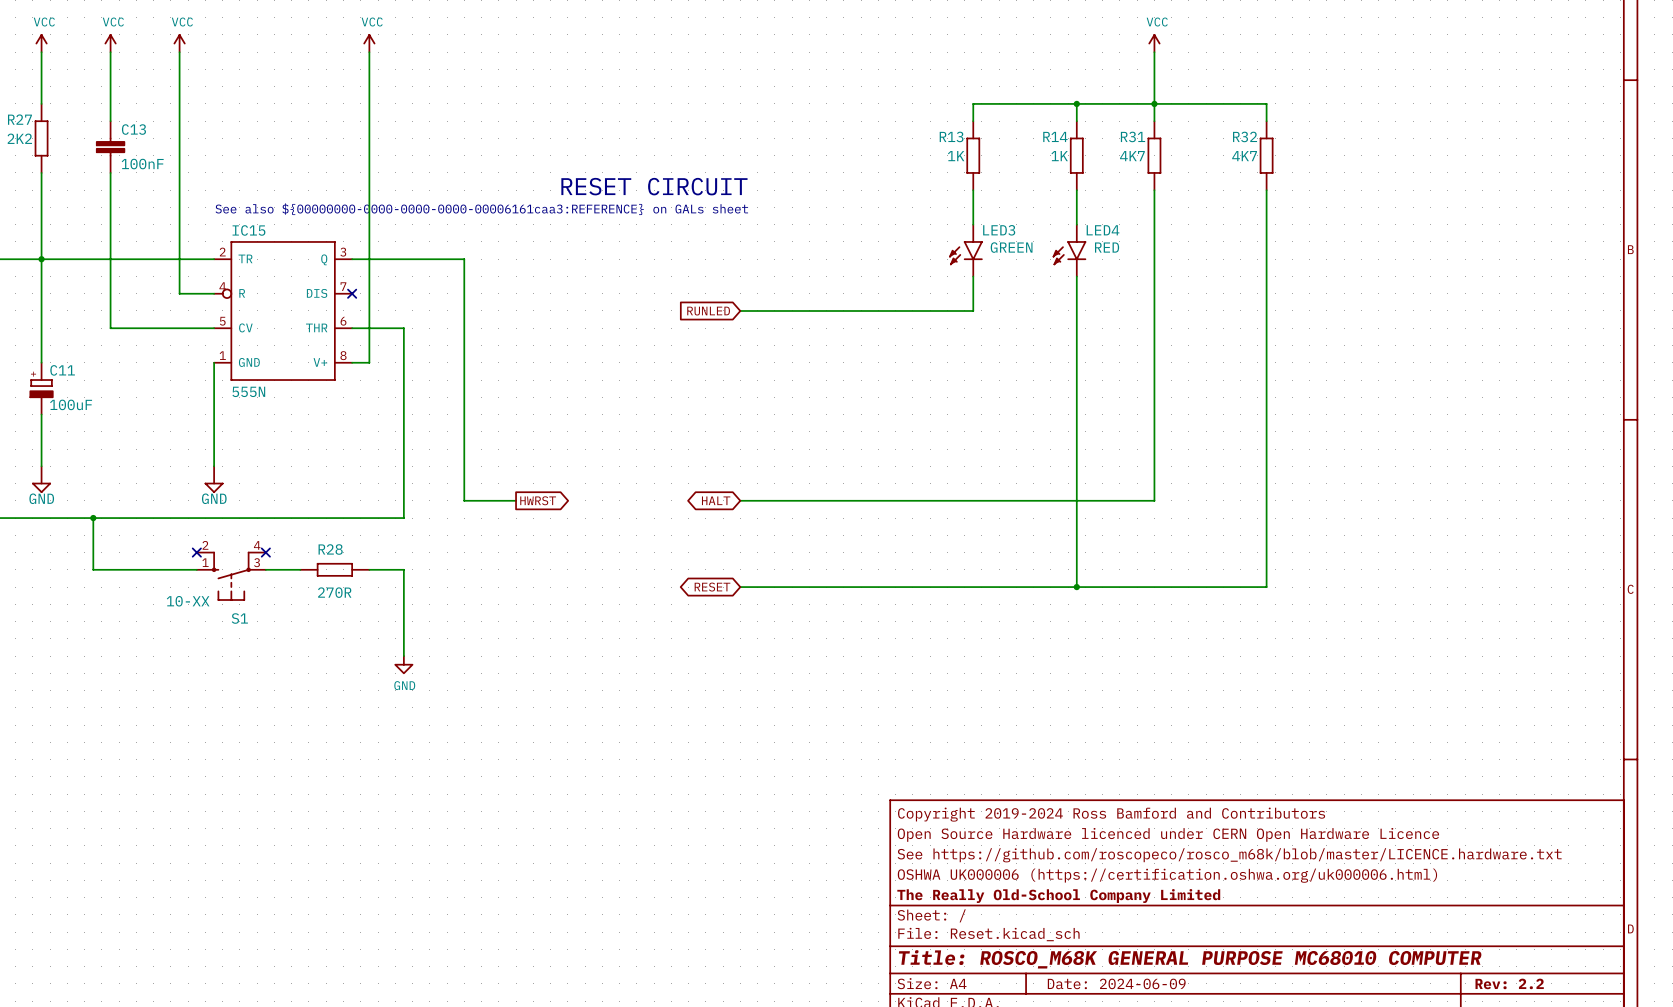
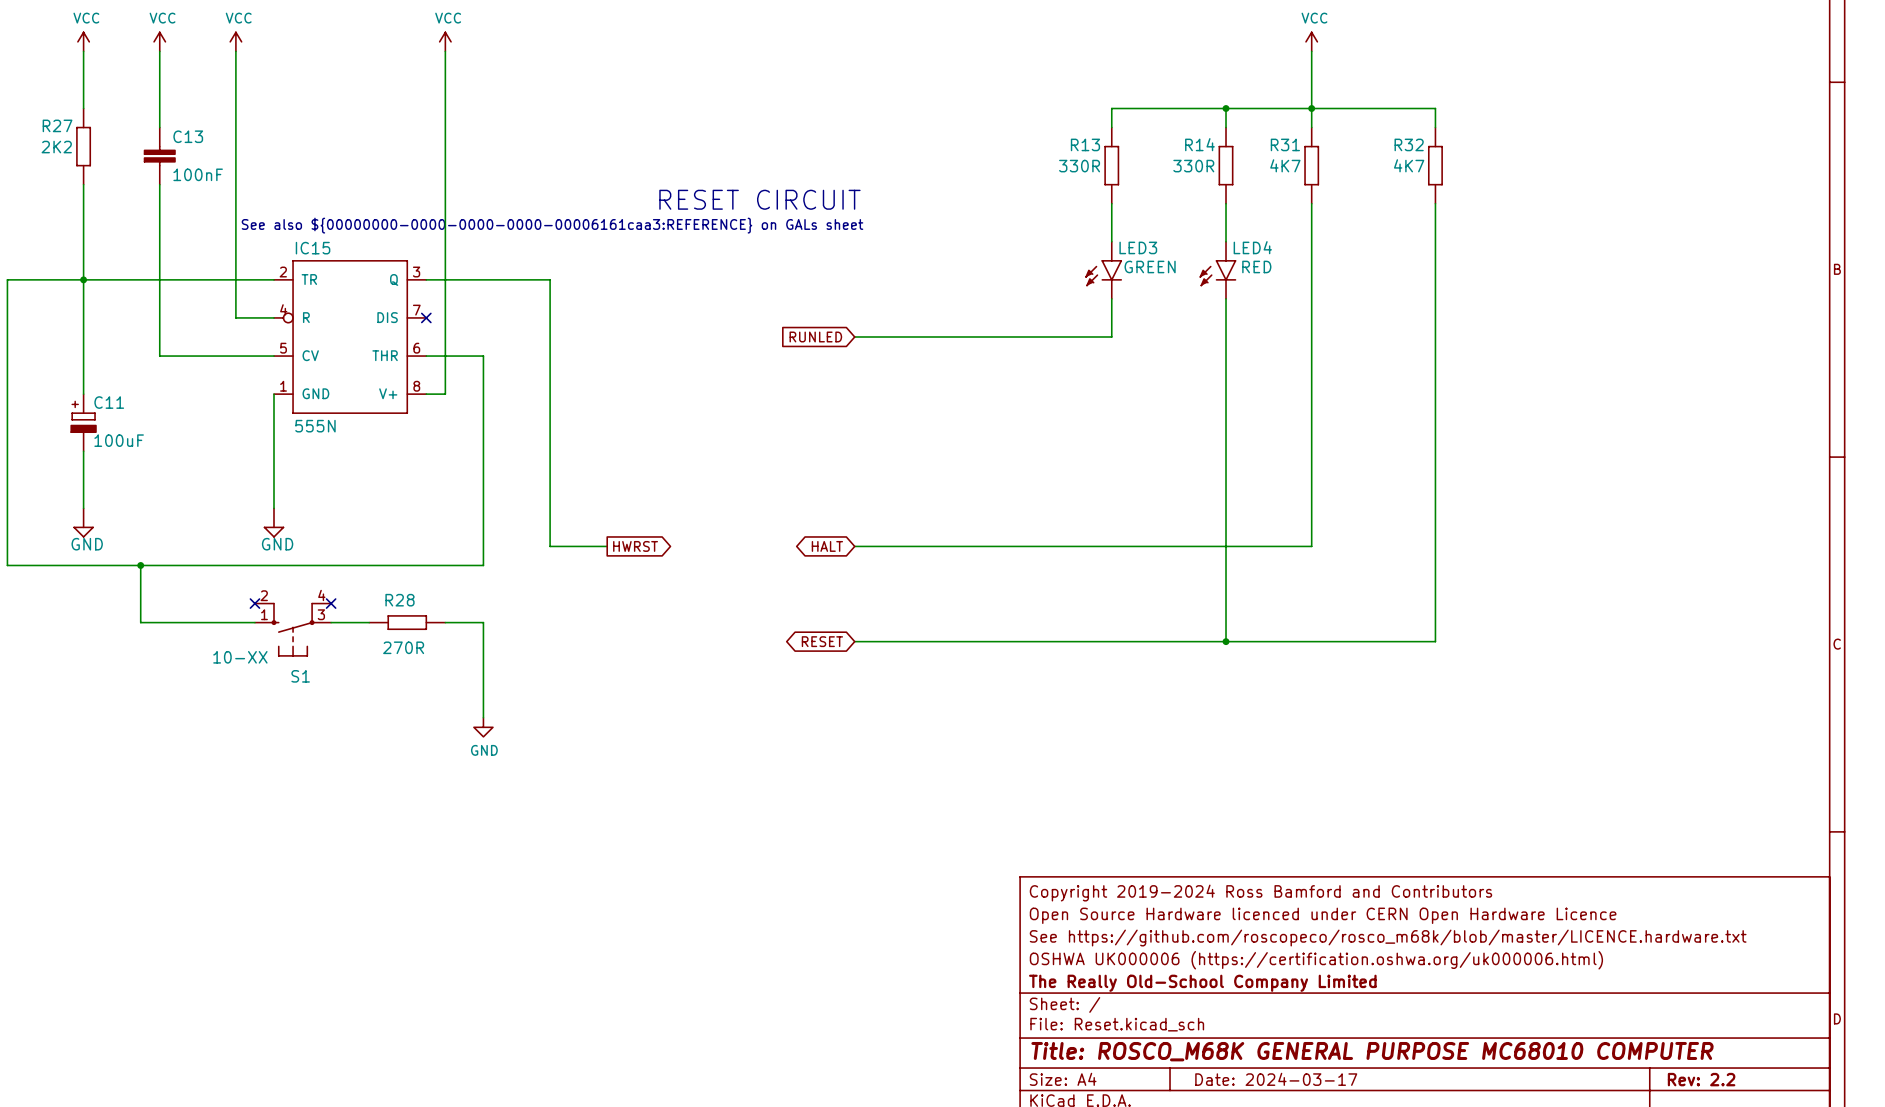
R13 value: 1K (956, 156) -> 330R (1079, 166)
R14 value: 1K (1059, 156) -> 330R (1193, 166)
title block: Date: 2024-06-09 (1116, 983) -> Date: 2024-03-17 (1276, 1079)

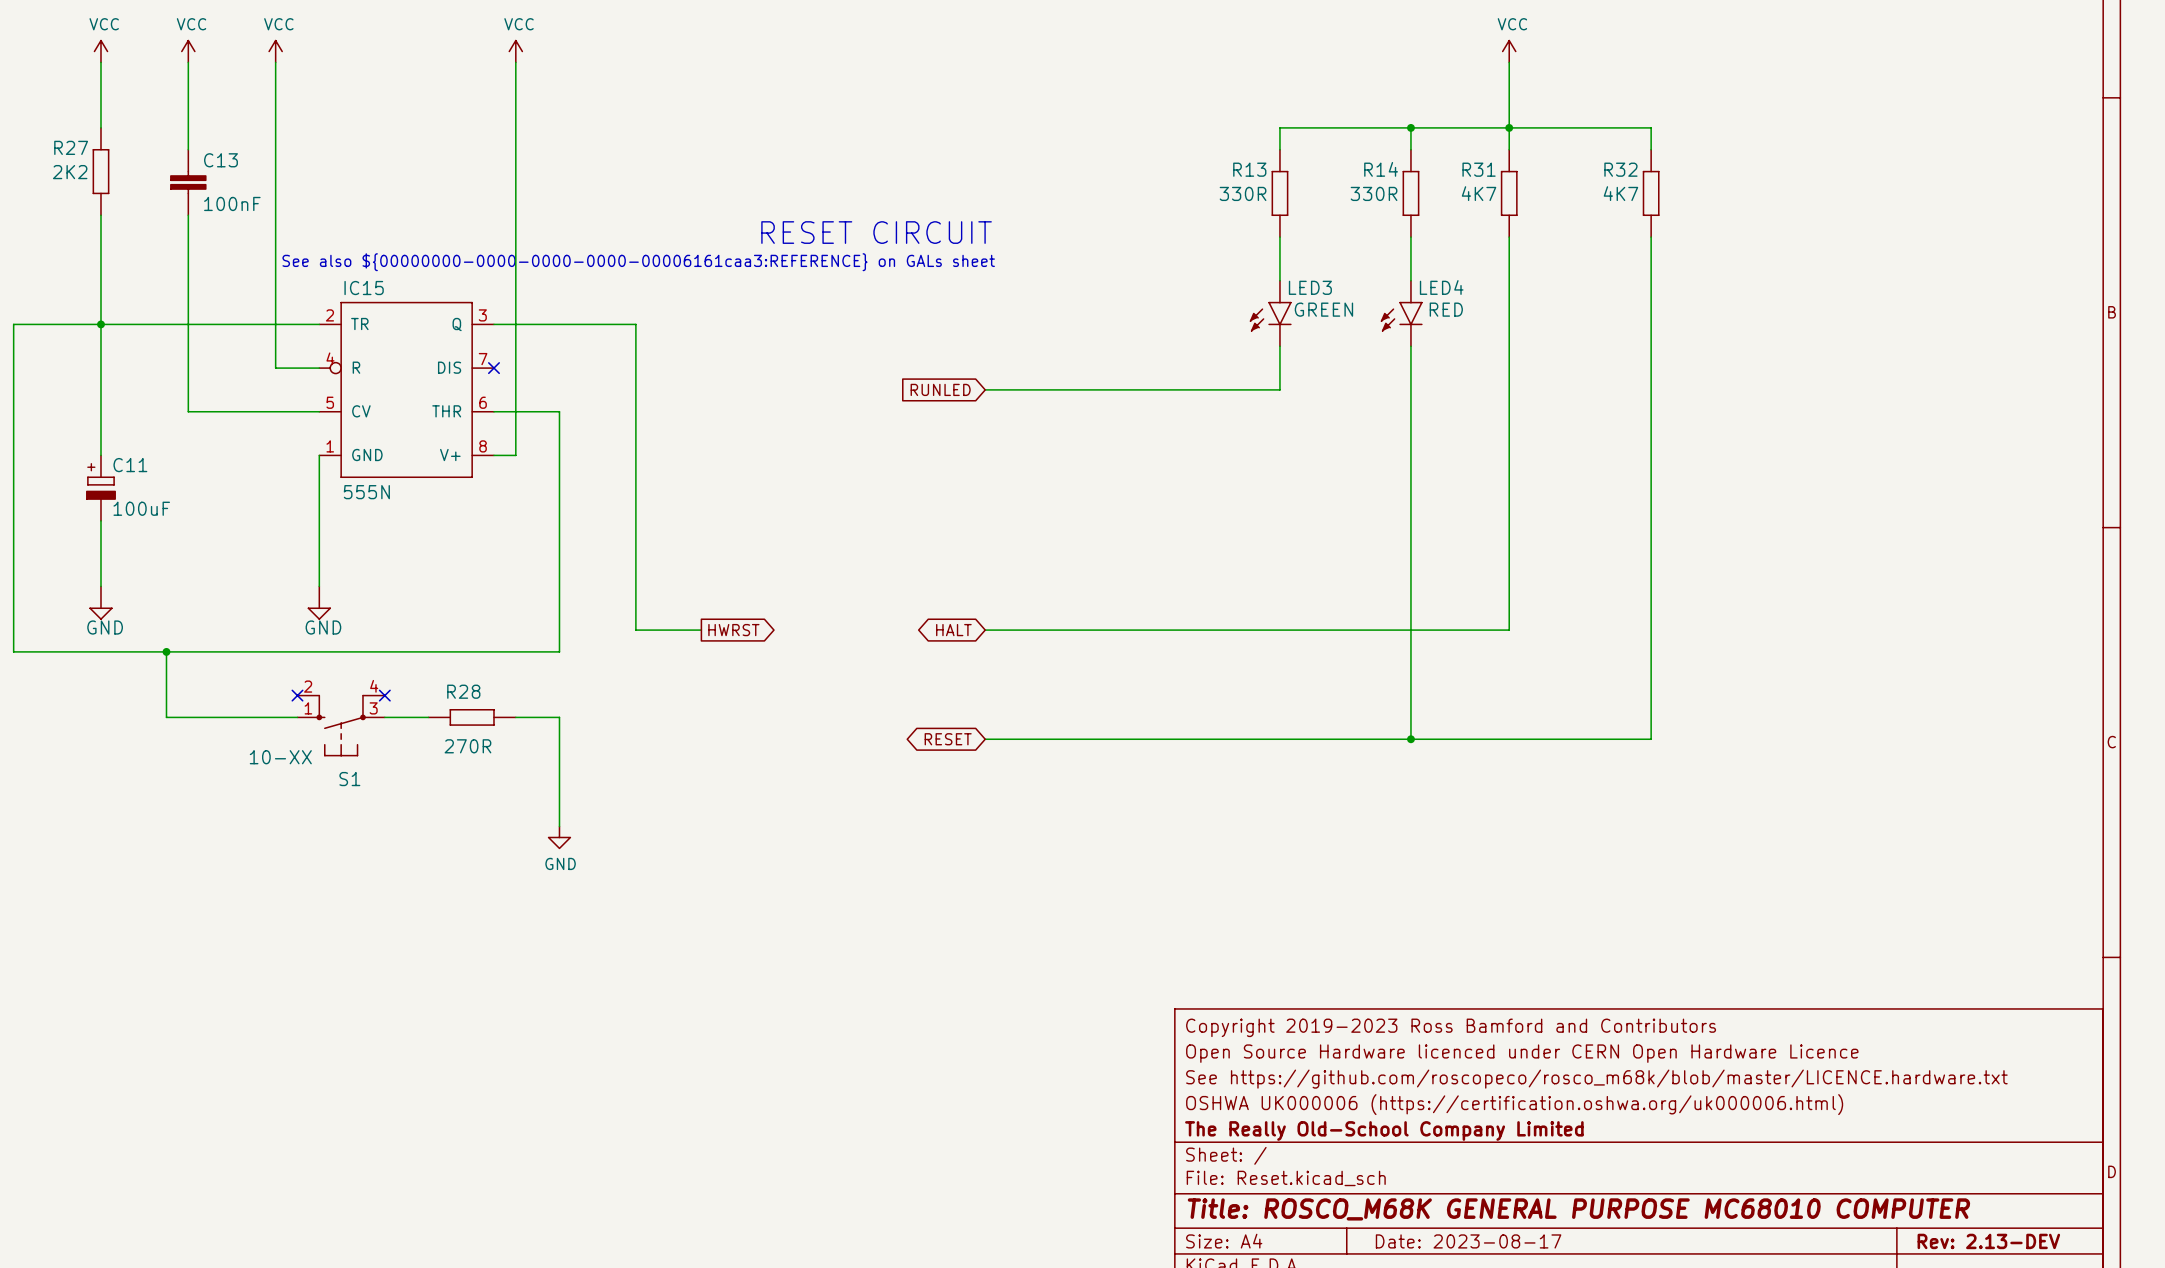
title block: Copyright 2019-2024 Ross Bamford and Contributors (1260, 893) -> Copyright 2019-2023 Ross Bamford and Contributors (1451, 1027)
title block: Date: 2024-03-17 (1276, 1079) -> Date: 2023-08-17 (1468, 1241)
title block: Rev: 2.2 (1701, 1079) -> Rev: 2.13-DEV (1988, 1241)

